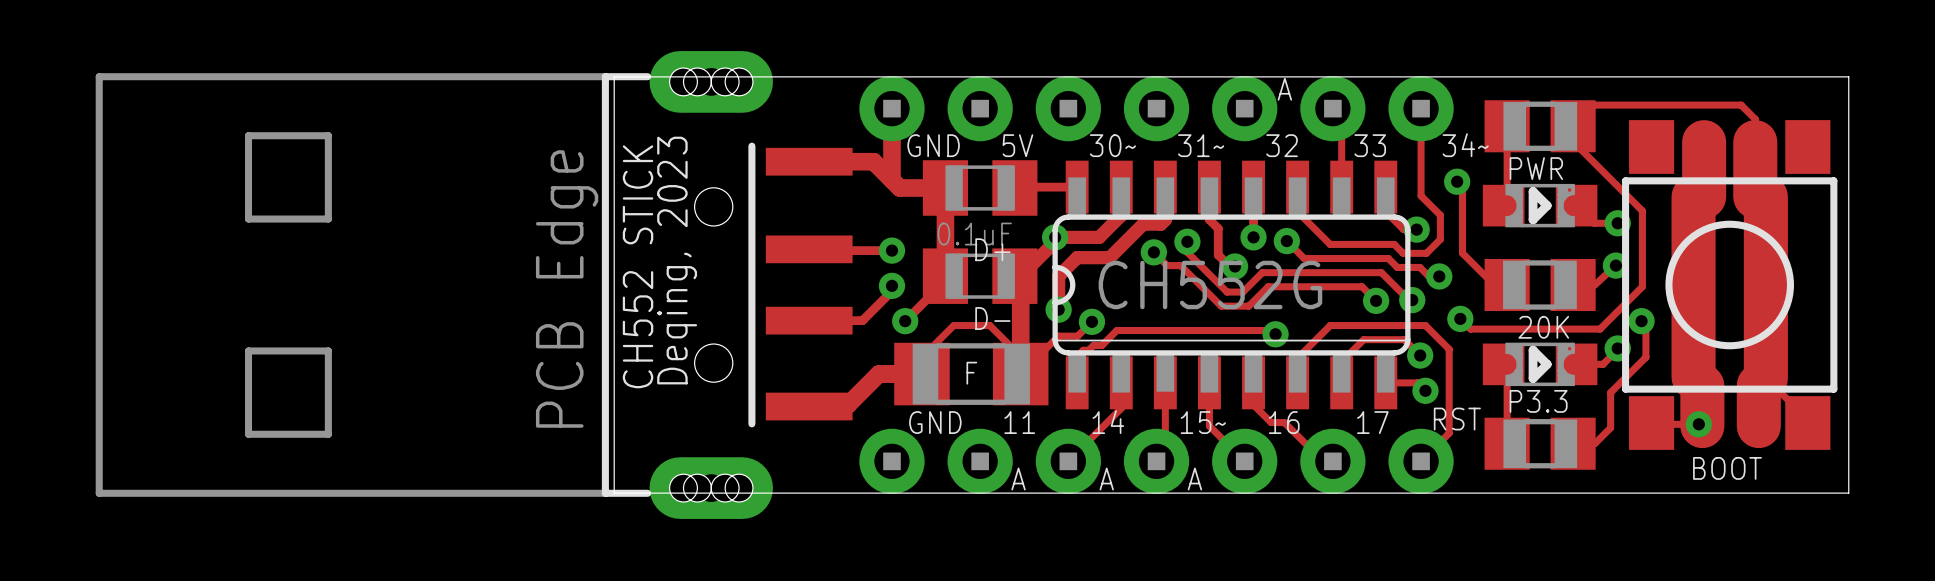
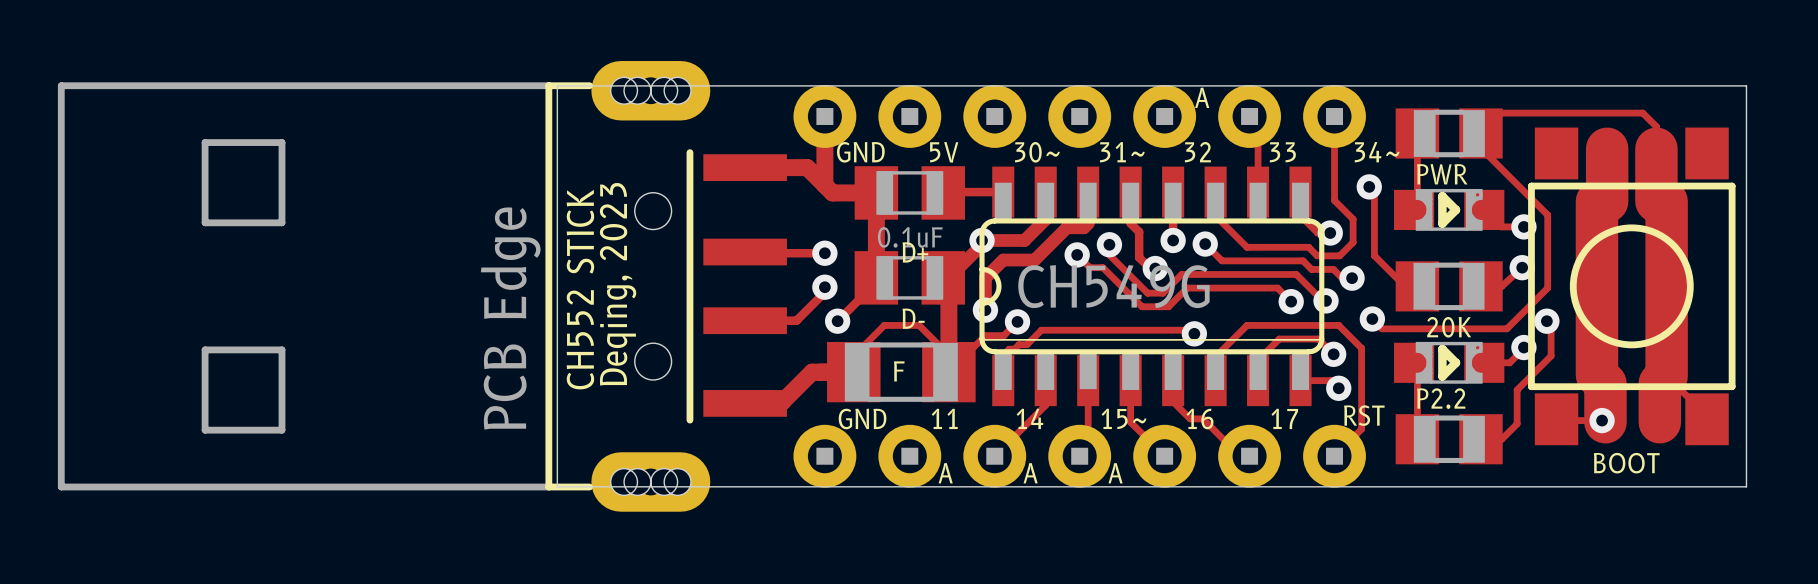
part value: CH552G (1210, 285) -> CH549G (1113, 286)
text: P3.3 (1538, 401) -> P2.2 (1441, 398)

